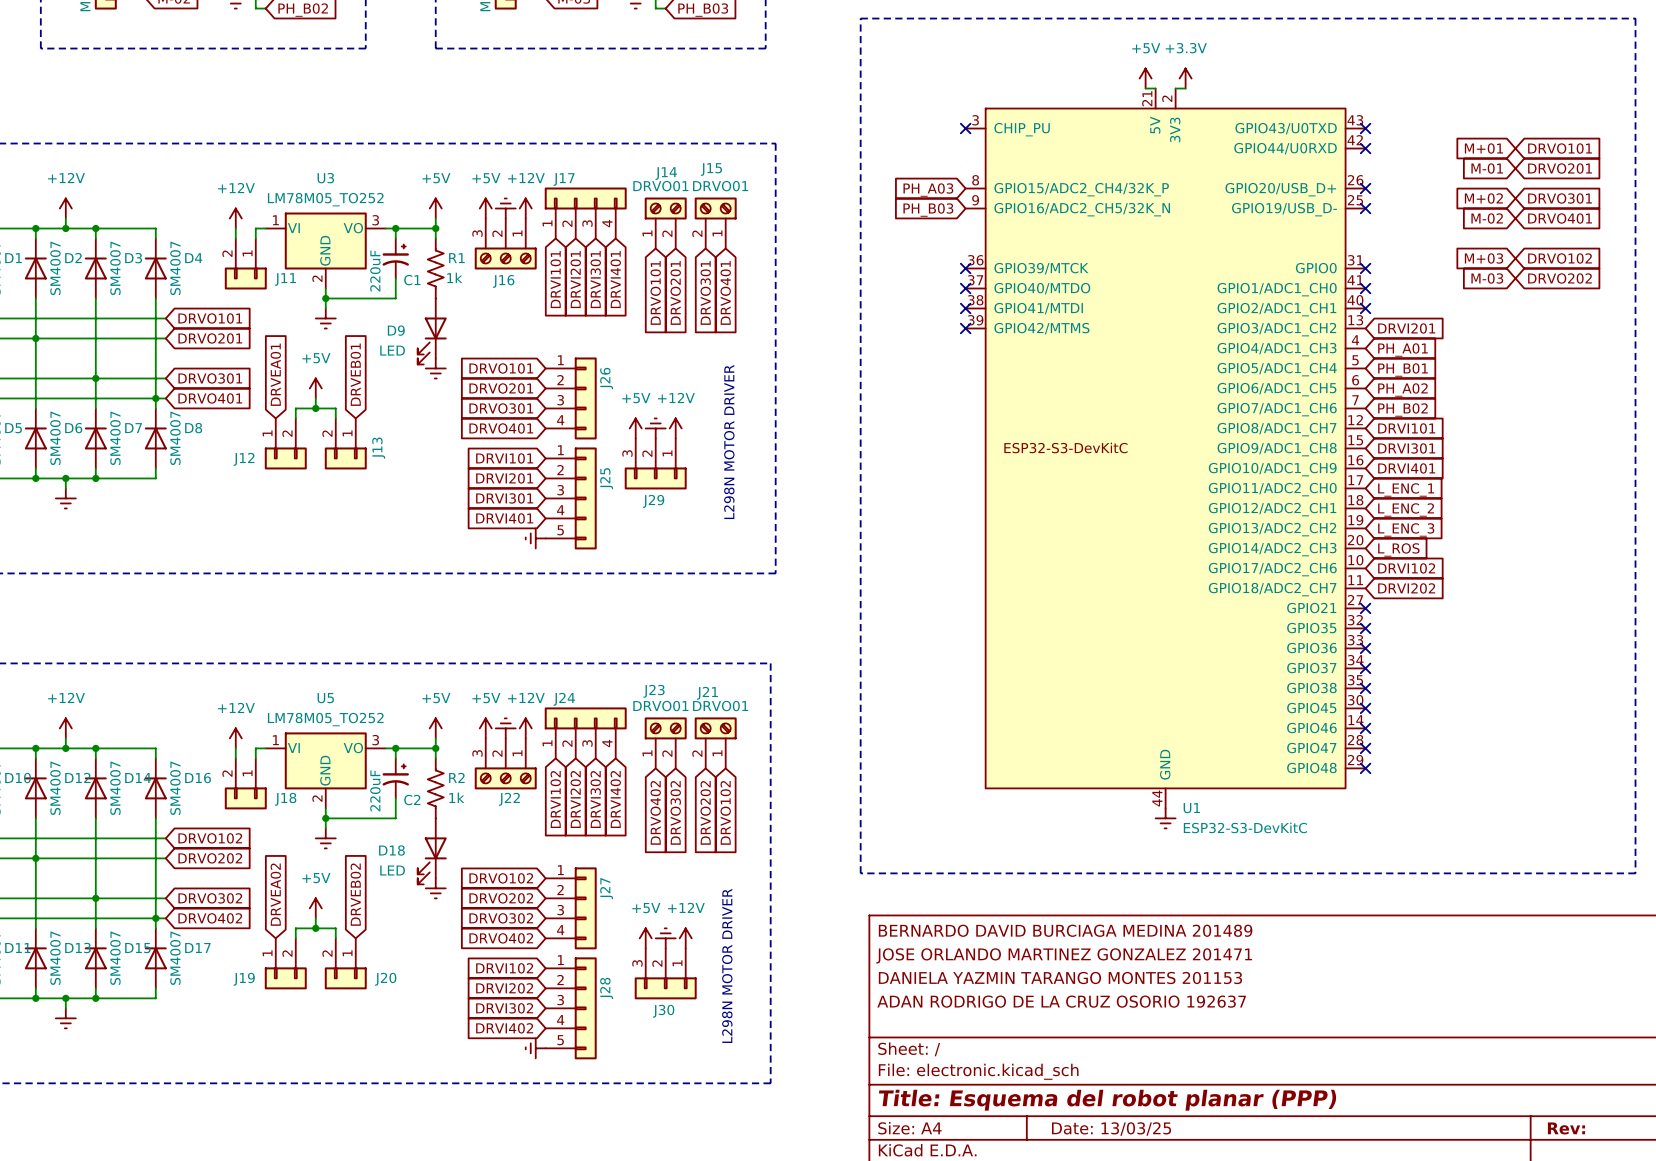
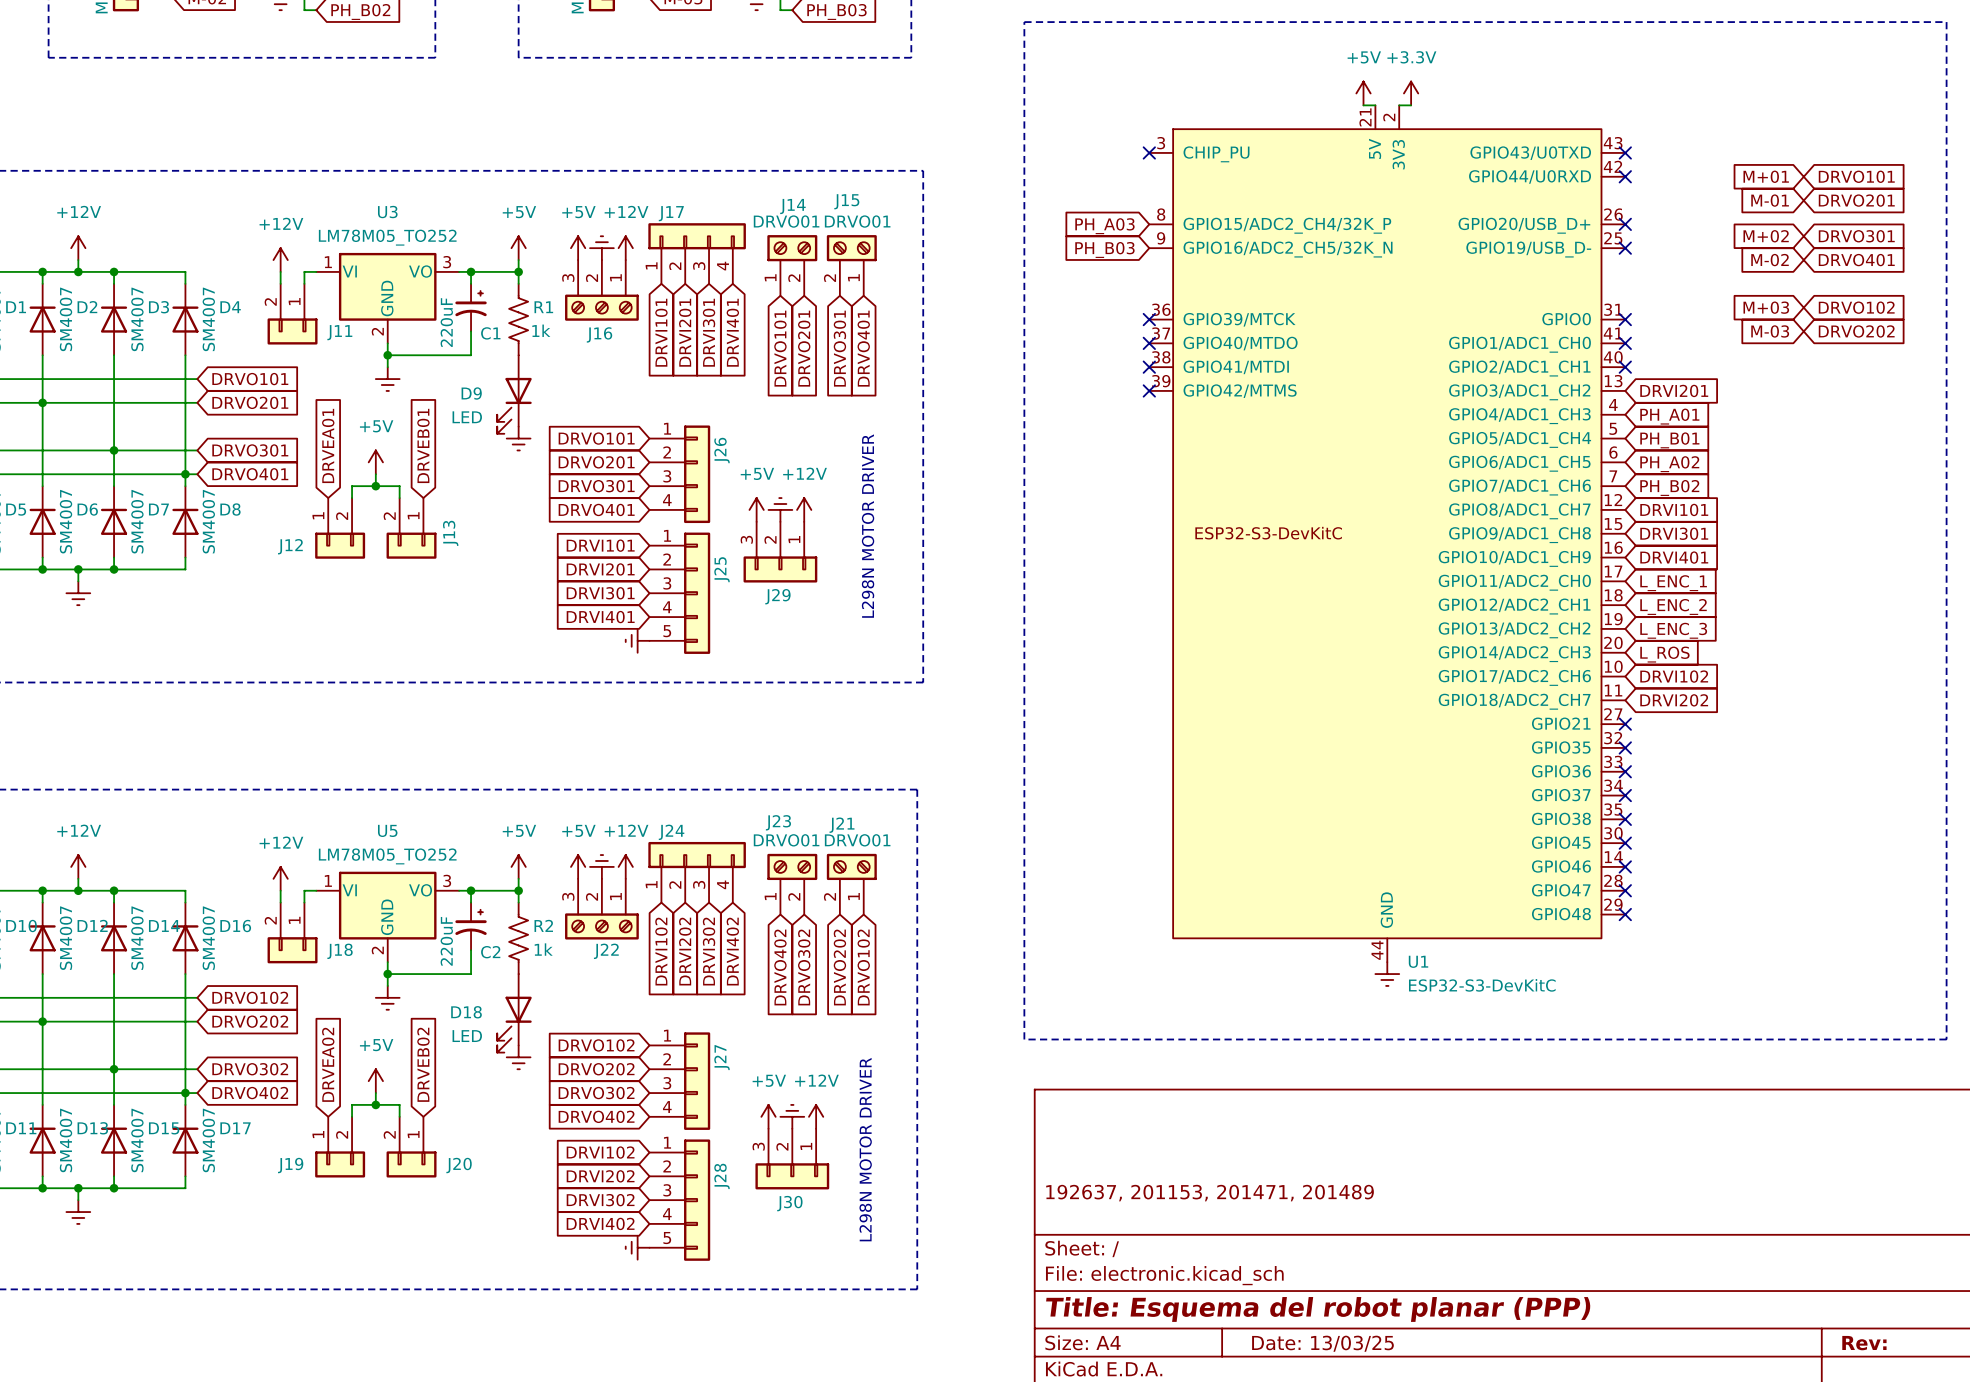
title block: BERNARDO DAVID BURCIAGA MEDINA 201489 (1065, 930) -> none
title block: JOSE ORLANDO MARTINEZ GONZALEZ 201471 (1064, 955) -> none
title block: DANIELA YAZMIN TARANGO MONTES 201153 (1060, 978) -> none
title block: ADAN RODRIGO DE LA CRUZ OSORIO 192637 (1061, 1001) -> 192637, 201153, 201471, 201489 (1210, 1193)

